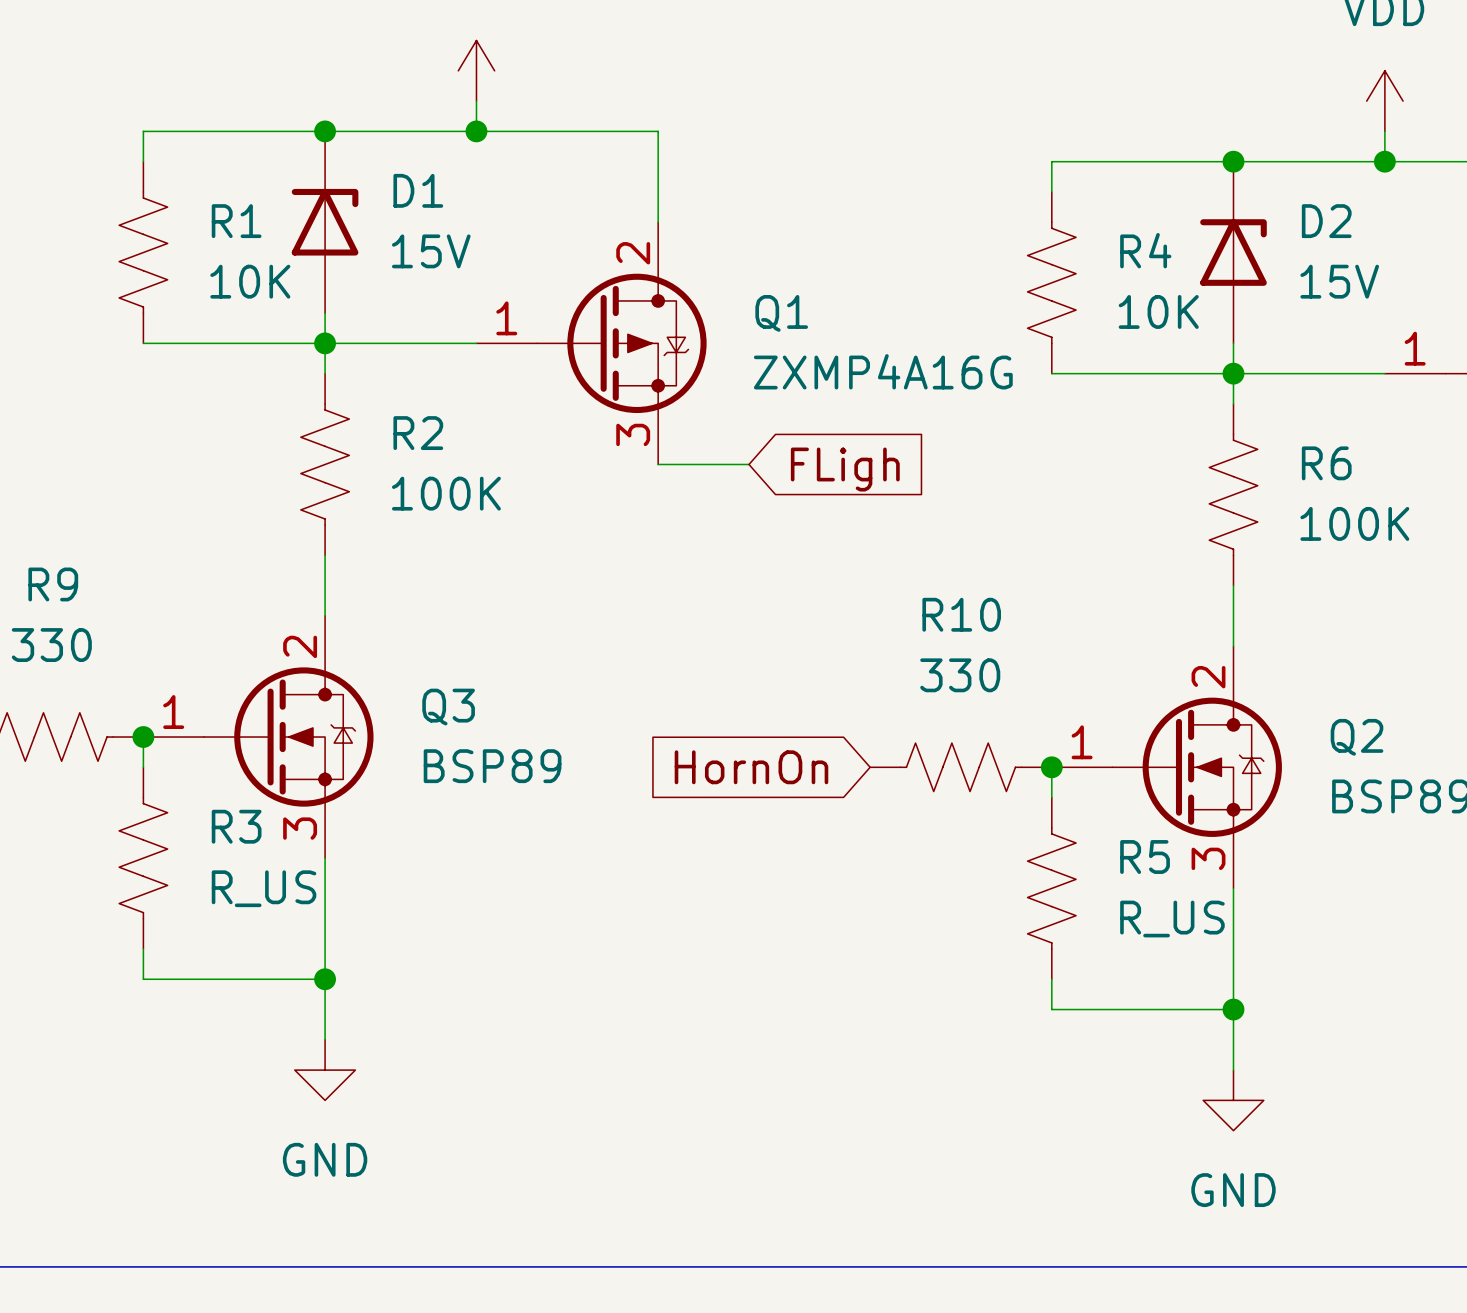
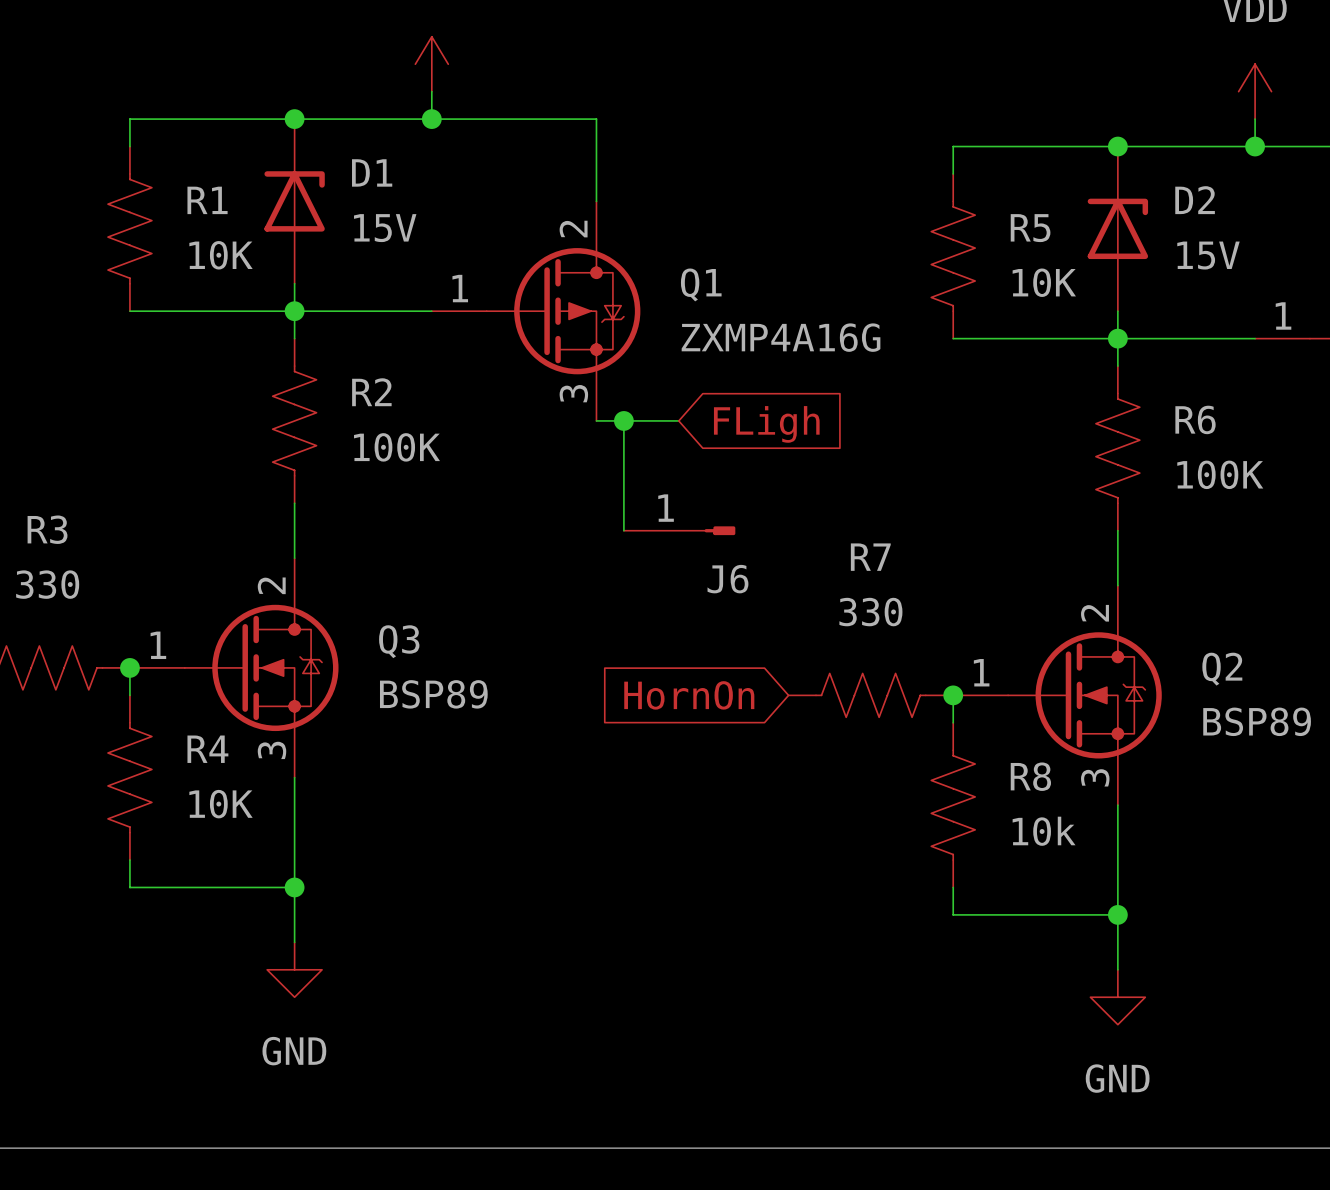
R4 name: R4 (1145, 250) -> R5 (1030, 228)
wire: none -> (623, 420) (623, 530)
junction: none -> (623, 420)
R9 name: R9 (53, 584) -> R3 (47, 529)
J6: none -> (679, 530)
R10 name: R10 (961, 614) -> R7 (870, 557)
R3 name: R3 (236, 826) -> R4 (207, 749)
R5 name: R5 (1145, 857) -> R8 (1030, 776)
R3 value: R_US (264, 888) -> 10K (221, 804)
R5 value: R_US (1172, 919) -> 10k (1044, 831)

